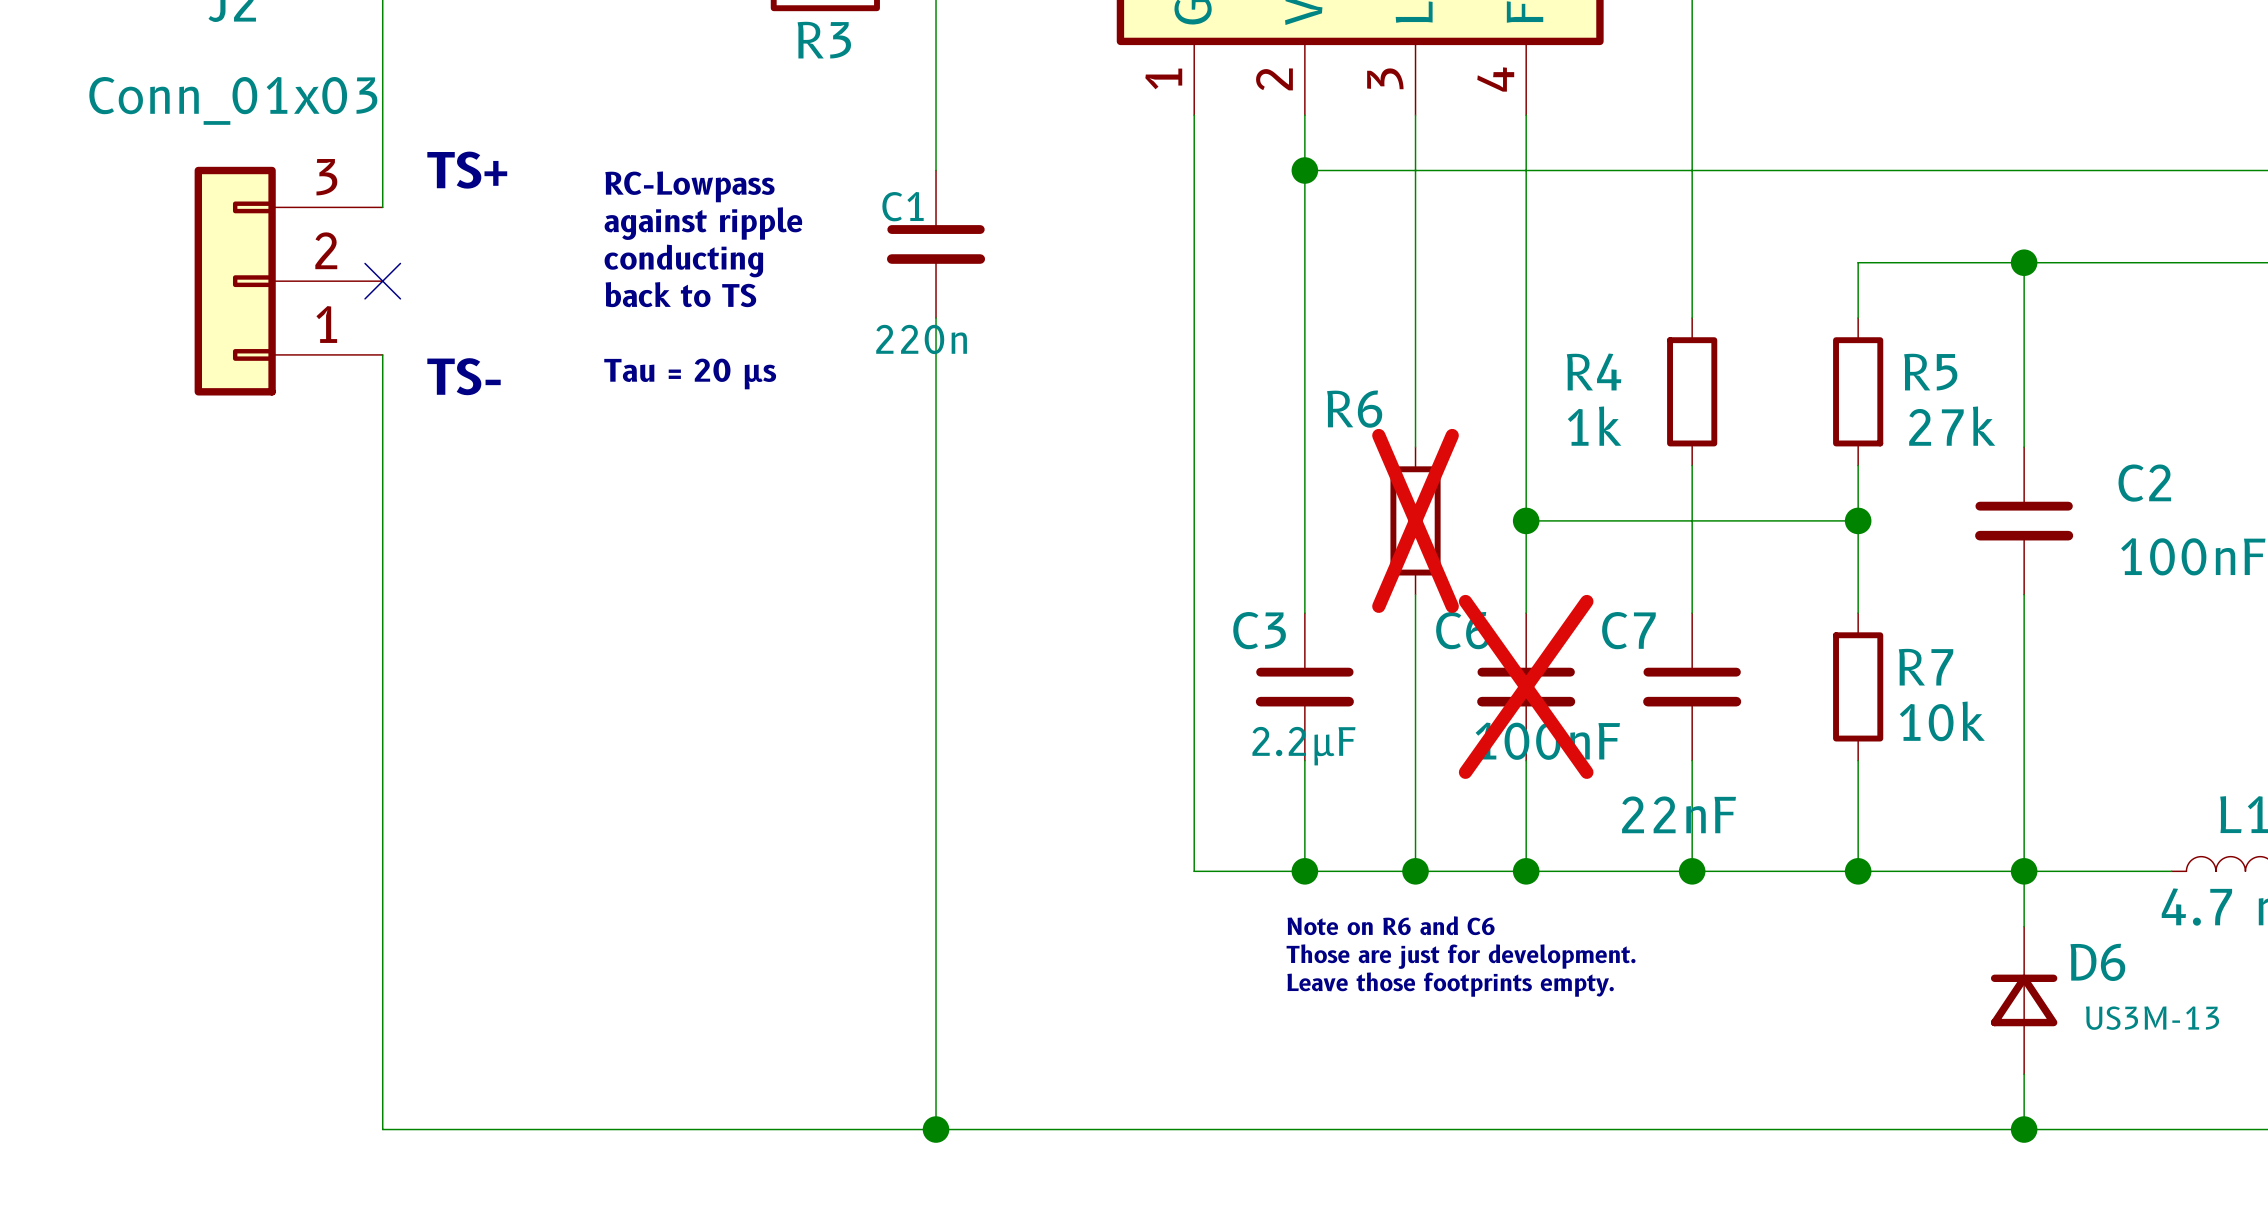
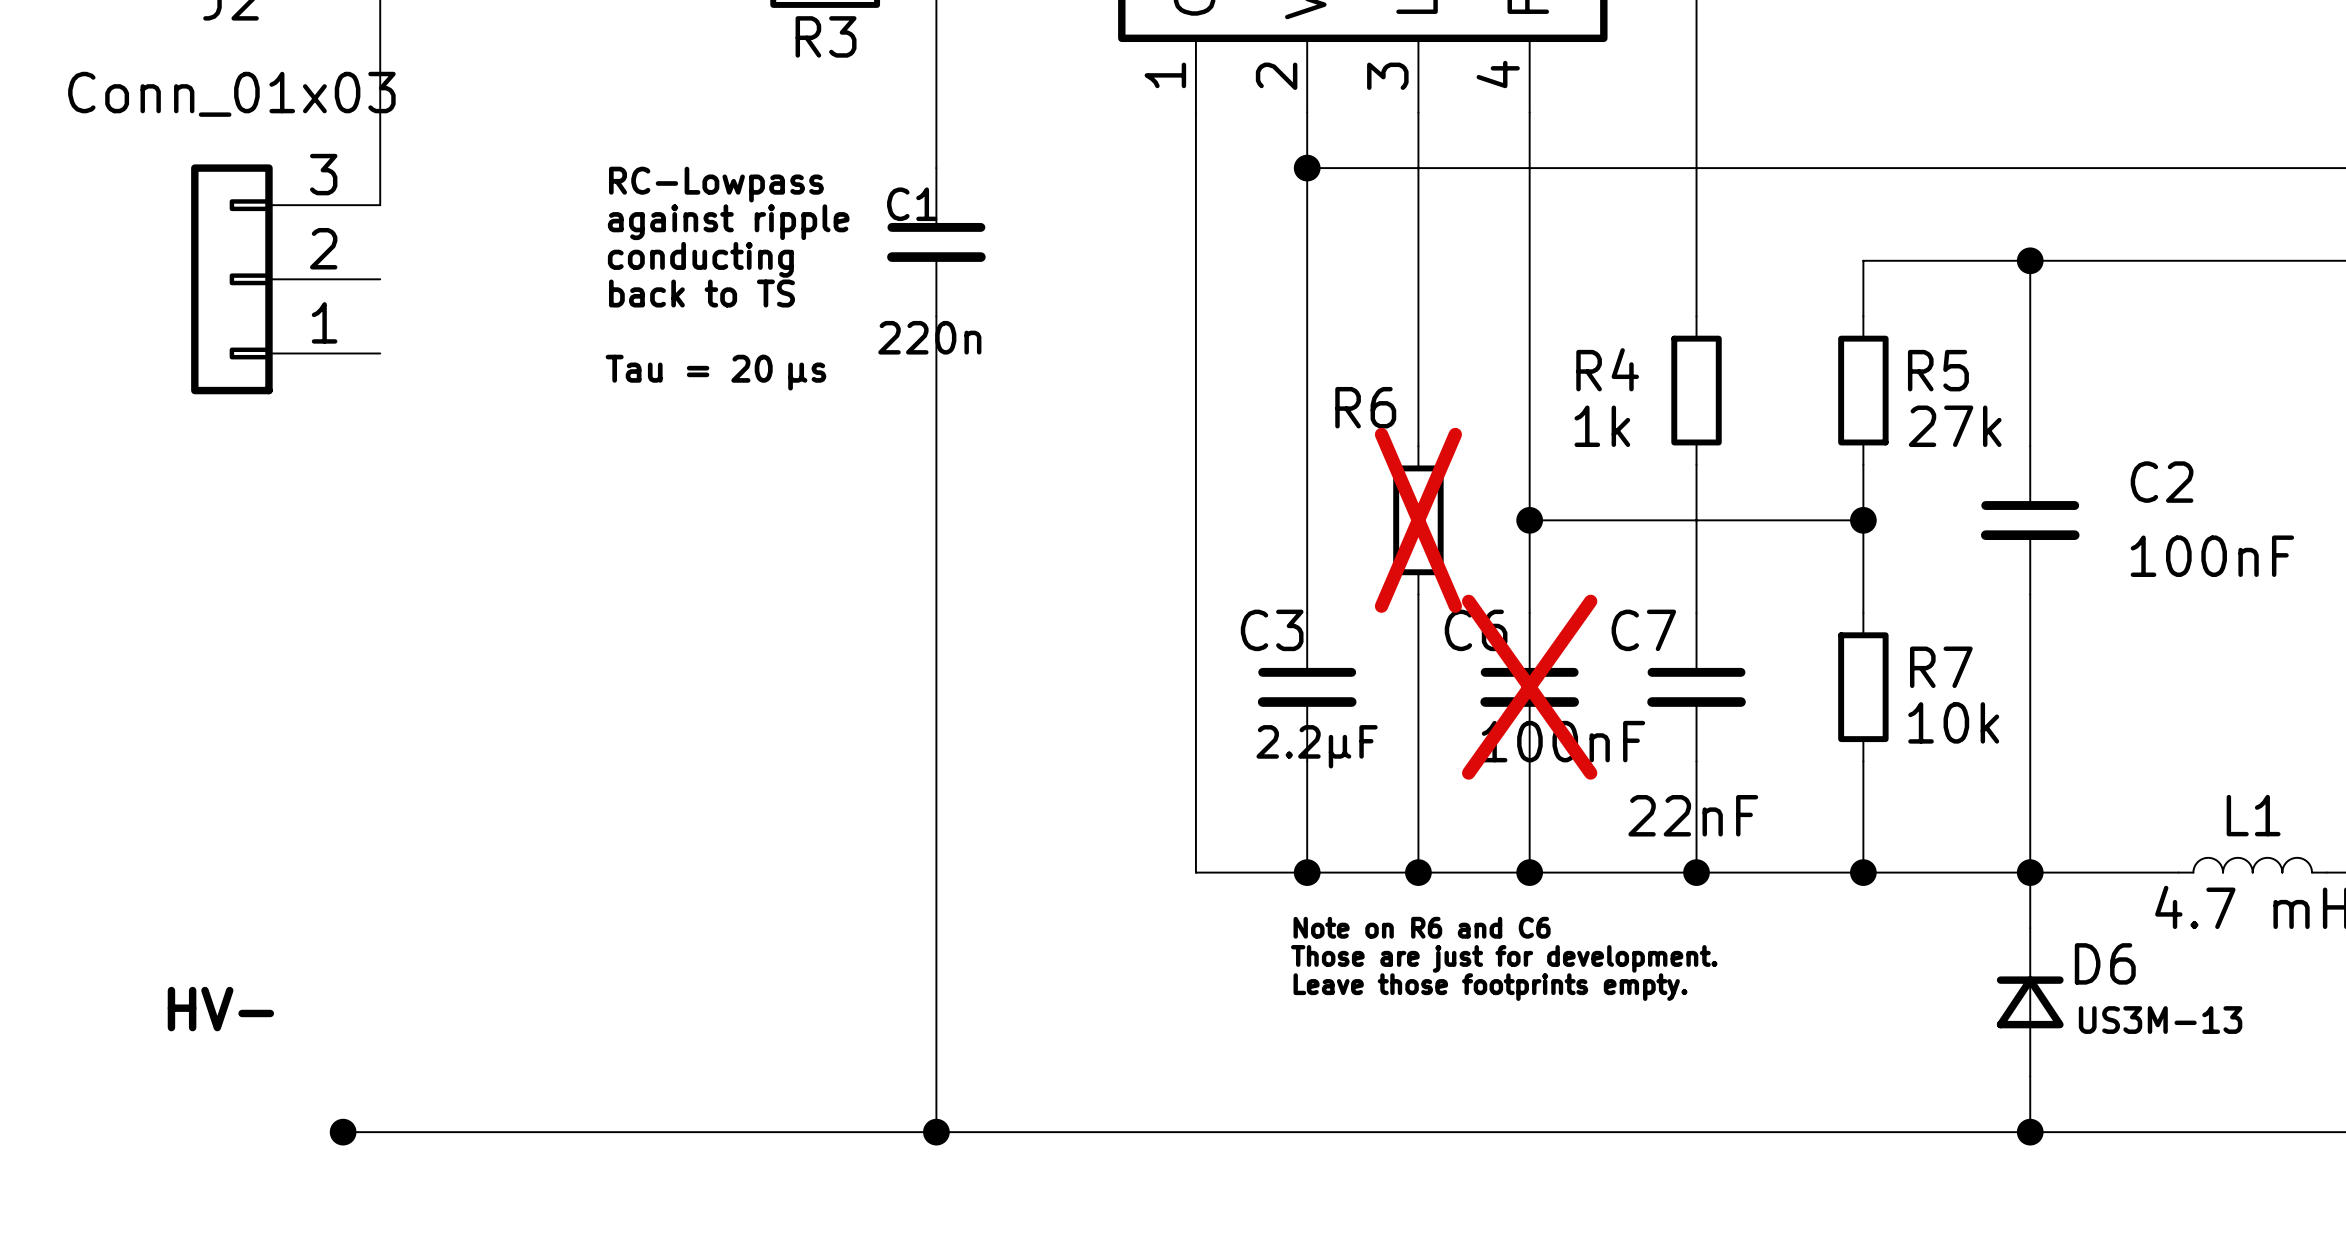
text: TS+ (467, 170) -> none
no-connect mark: (382, 281) -> none
wire: (382, 354) (382, 1129) -> (343, 1132) (380, 1132)
text: TS- (464, 376) -> none
text: none -> HV- (220, 1009)
junction: none -> (343, 1132)

